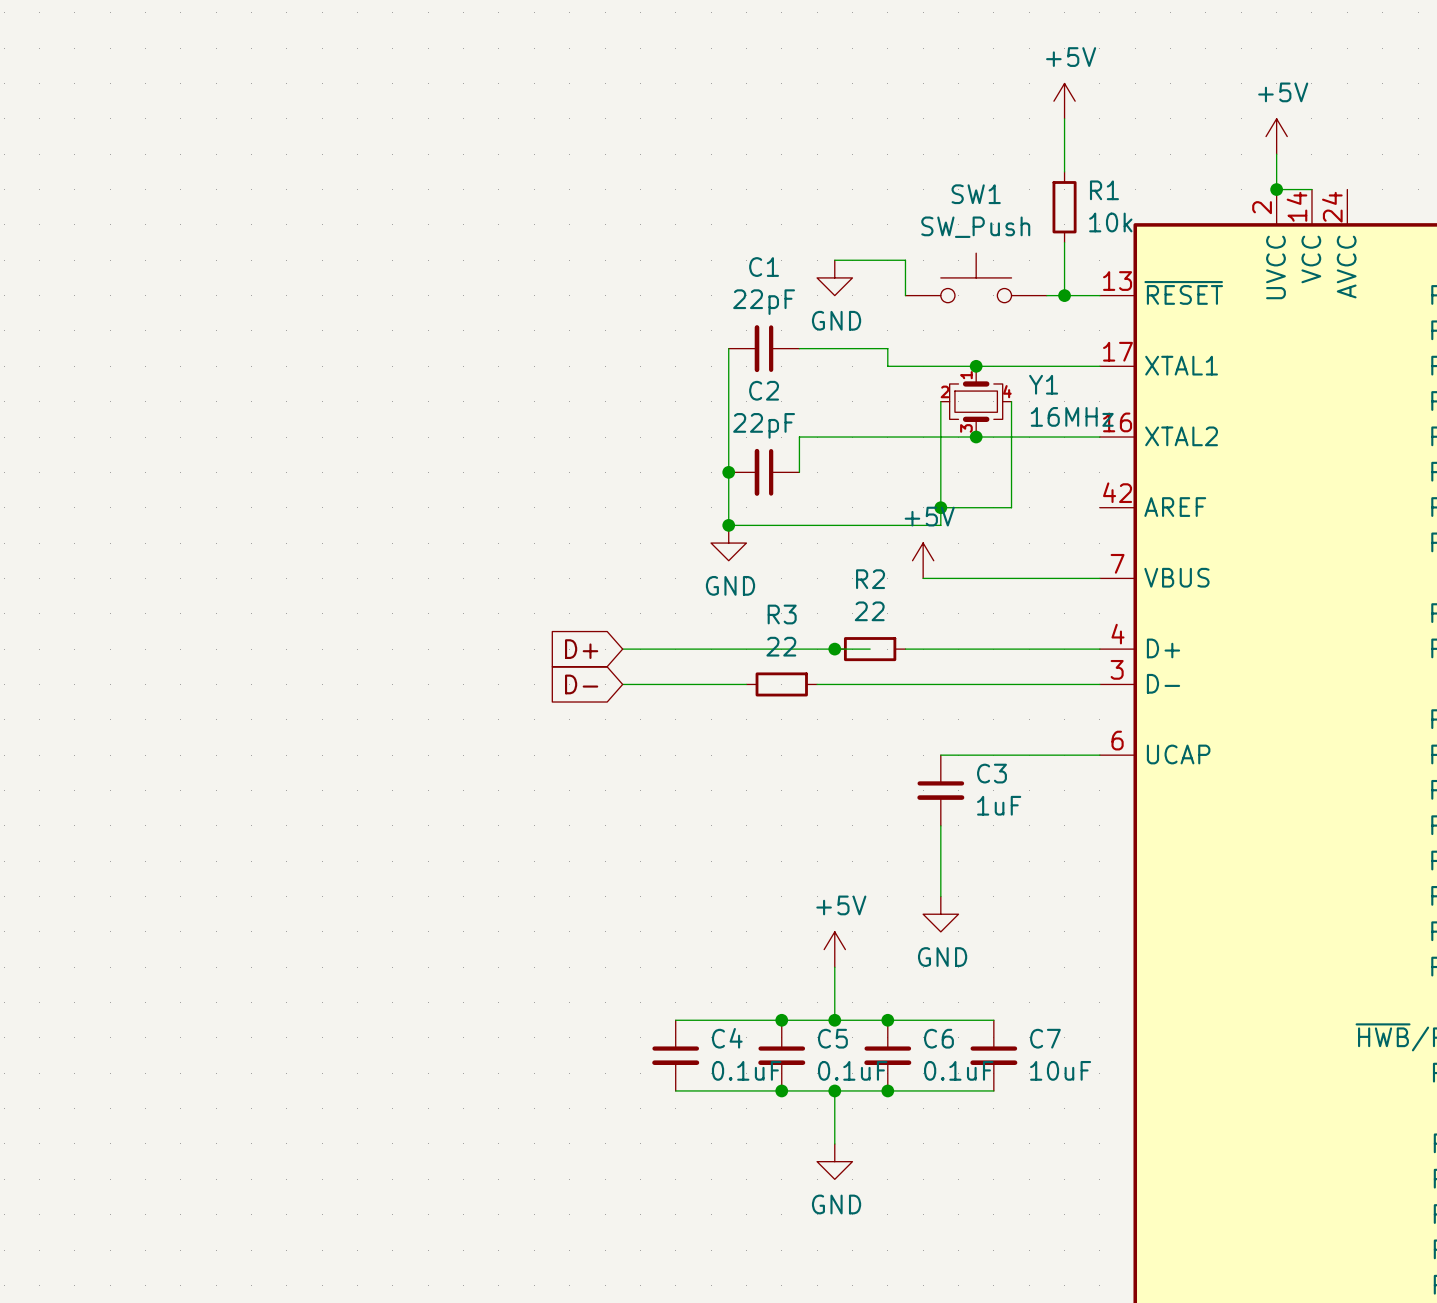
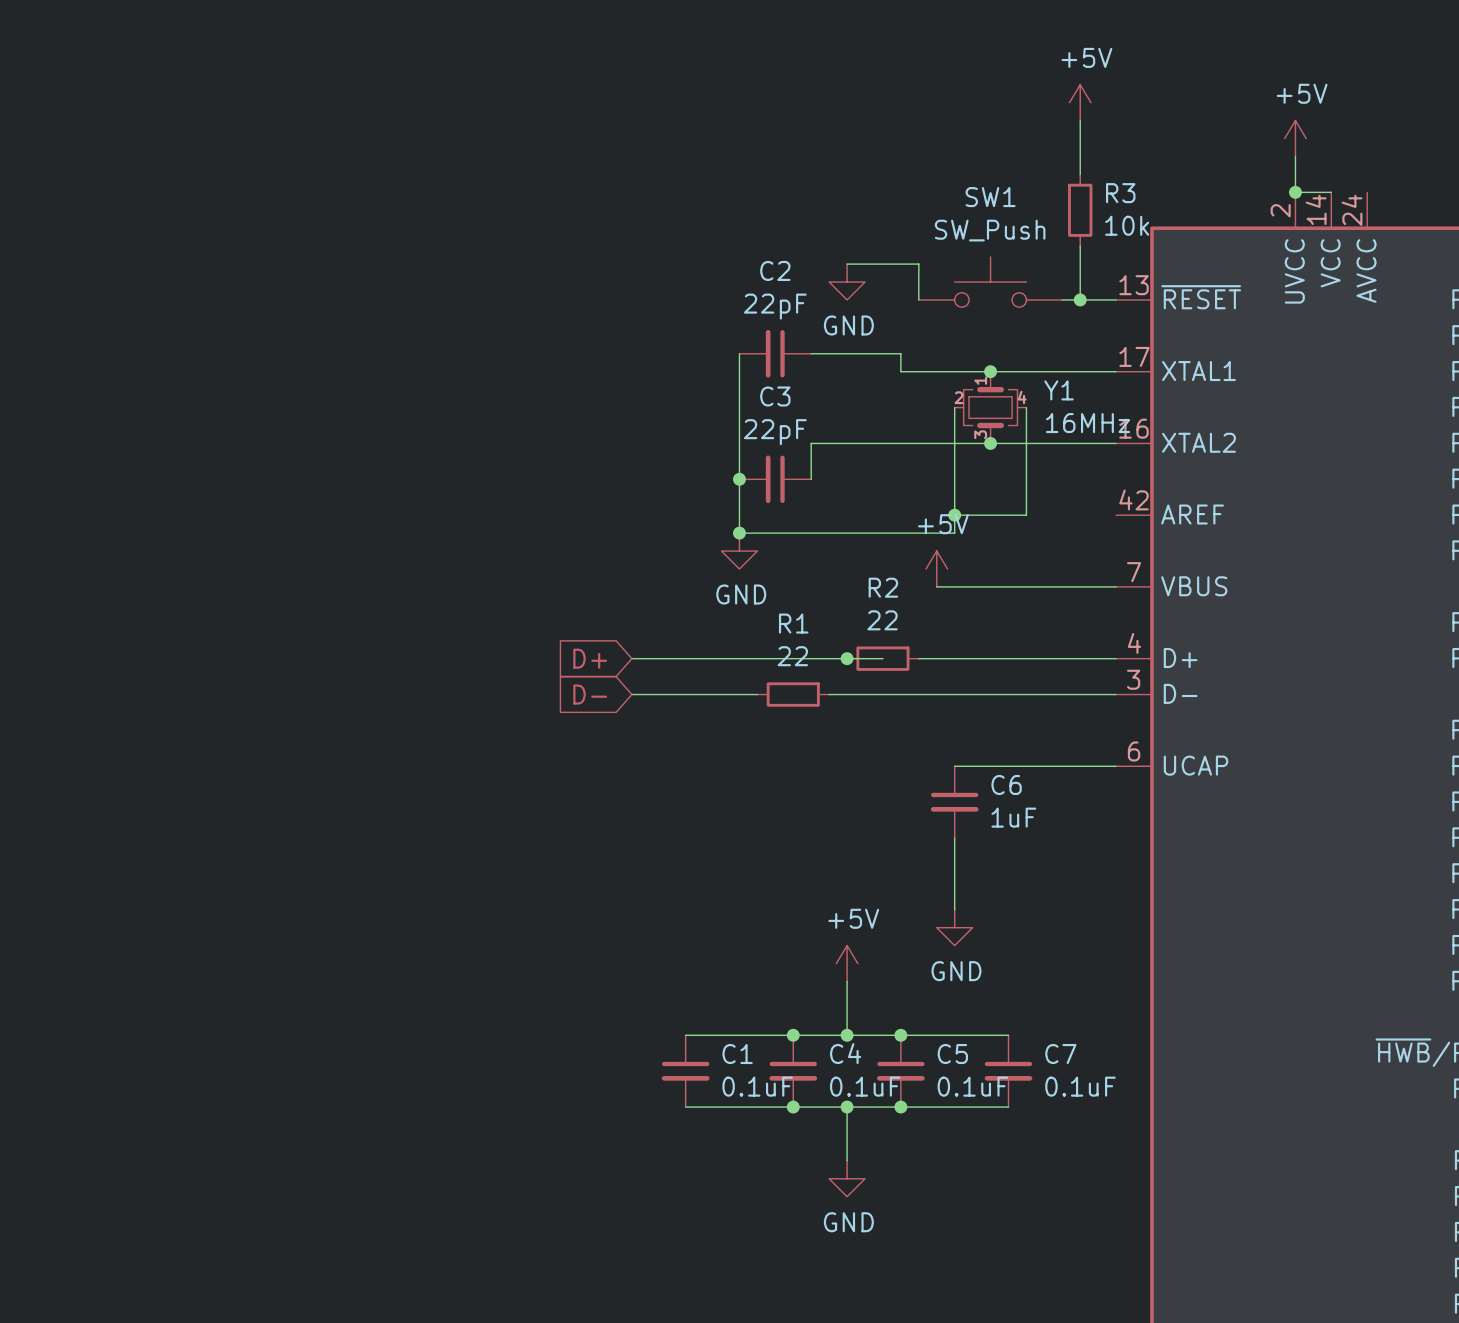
R1 name: R1 (1104, 190) -> R3 (1120, 193)
C1 name: C1 (764, 267) -> C2 (775, 270)
C2 name: C2 (764, 390) -> C3 (775, 396)
R3 name: R3 (782, 614) -> R1 (793, 623)
C3 name: C3 (991, 773) -> C6 (1006, 784)
C4 name: C4 (727, 1038) -> C1 (737, 1054)
C5 name: C5 (832, 1038) -> C4 (845, 1053)
C6 name: C6 (938, 1038) -> C5 (952, 1054)
C7 value: 10uF (1060, 1070) -> 0.1uF (1080, 1086)

